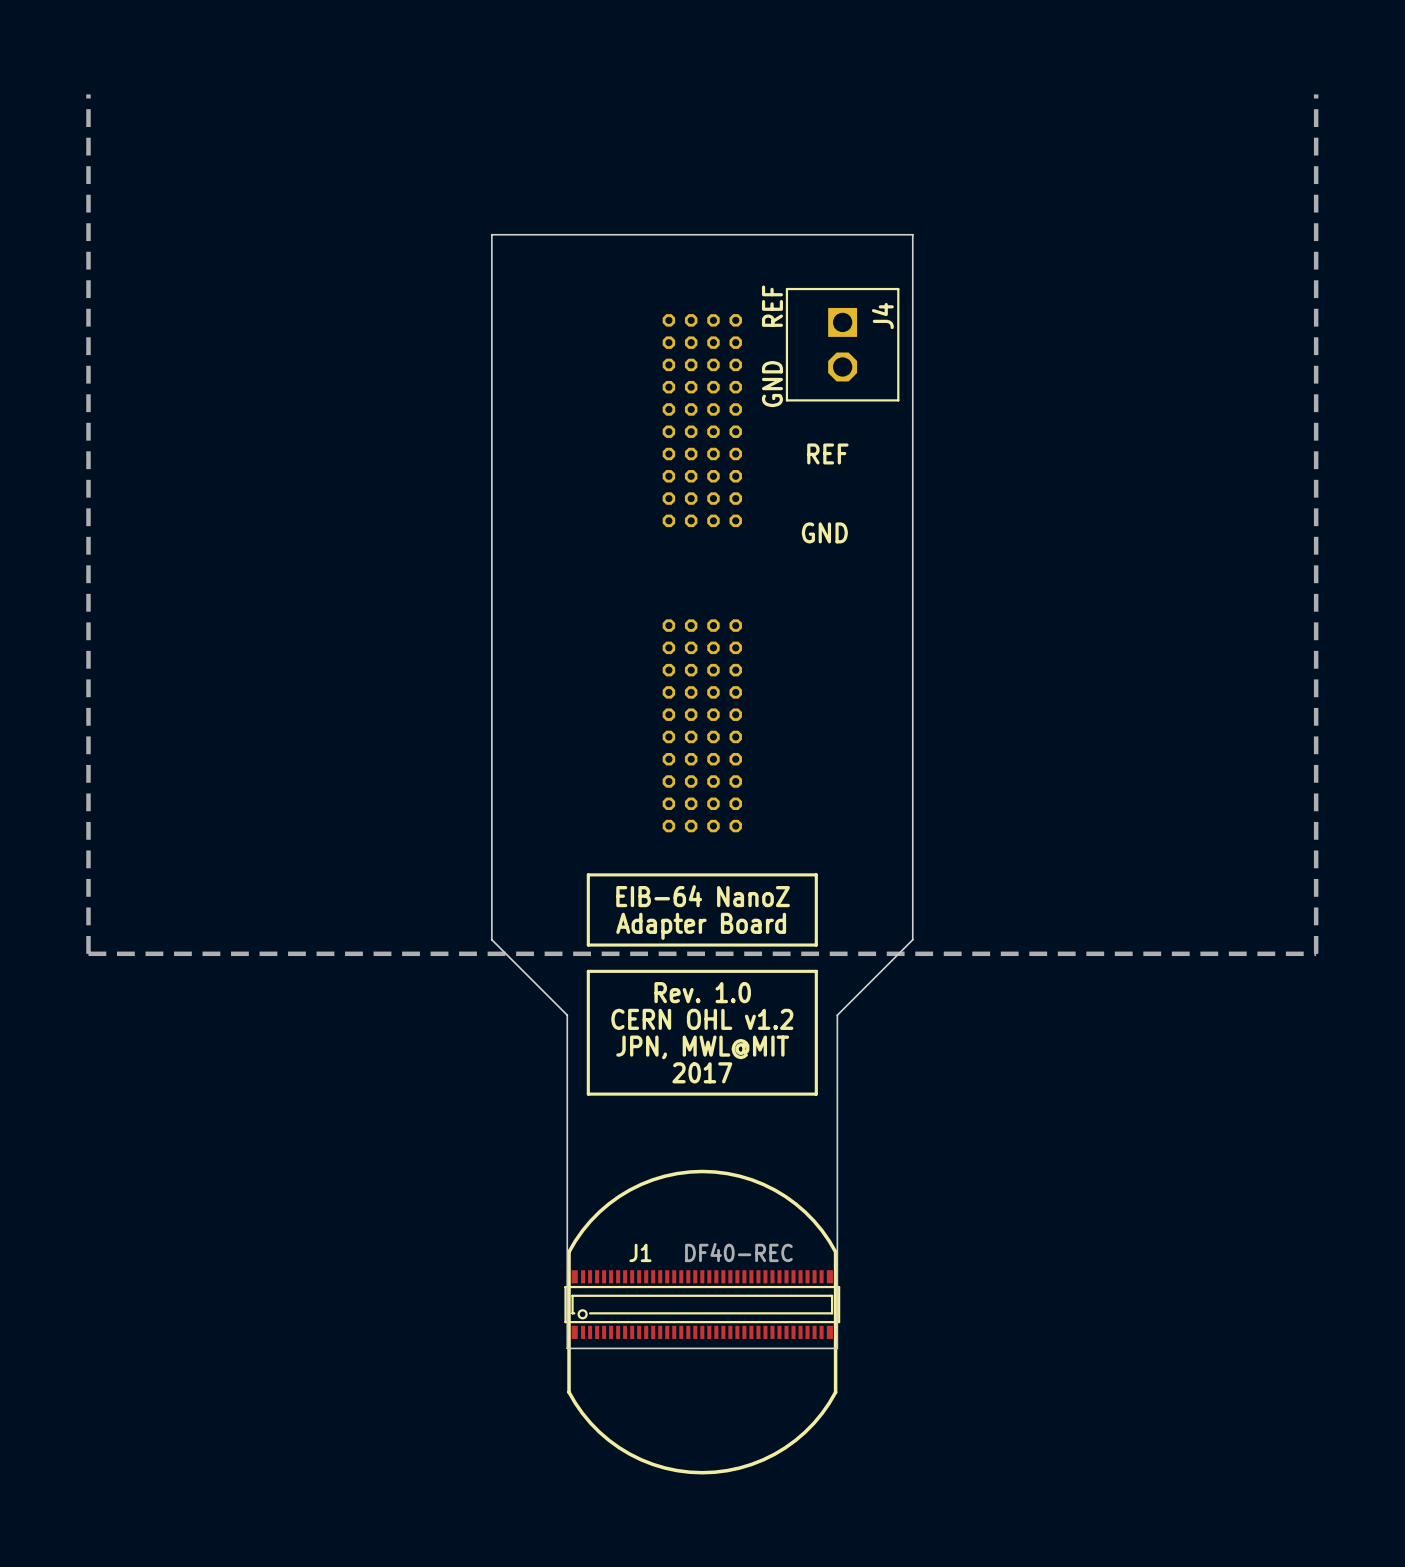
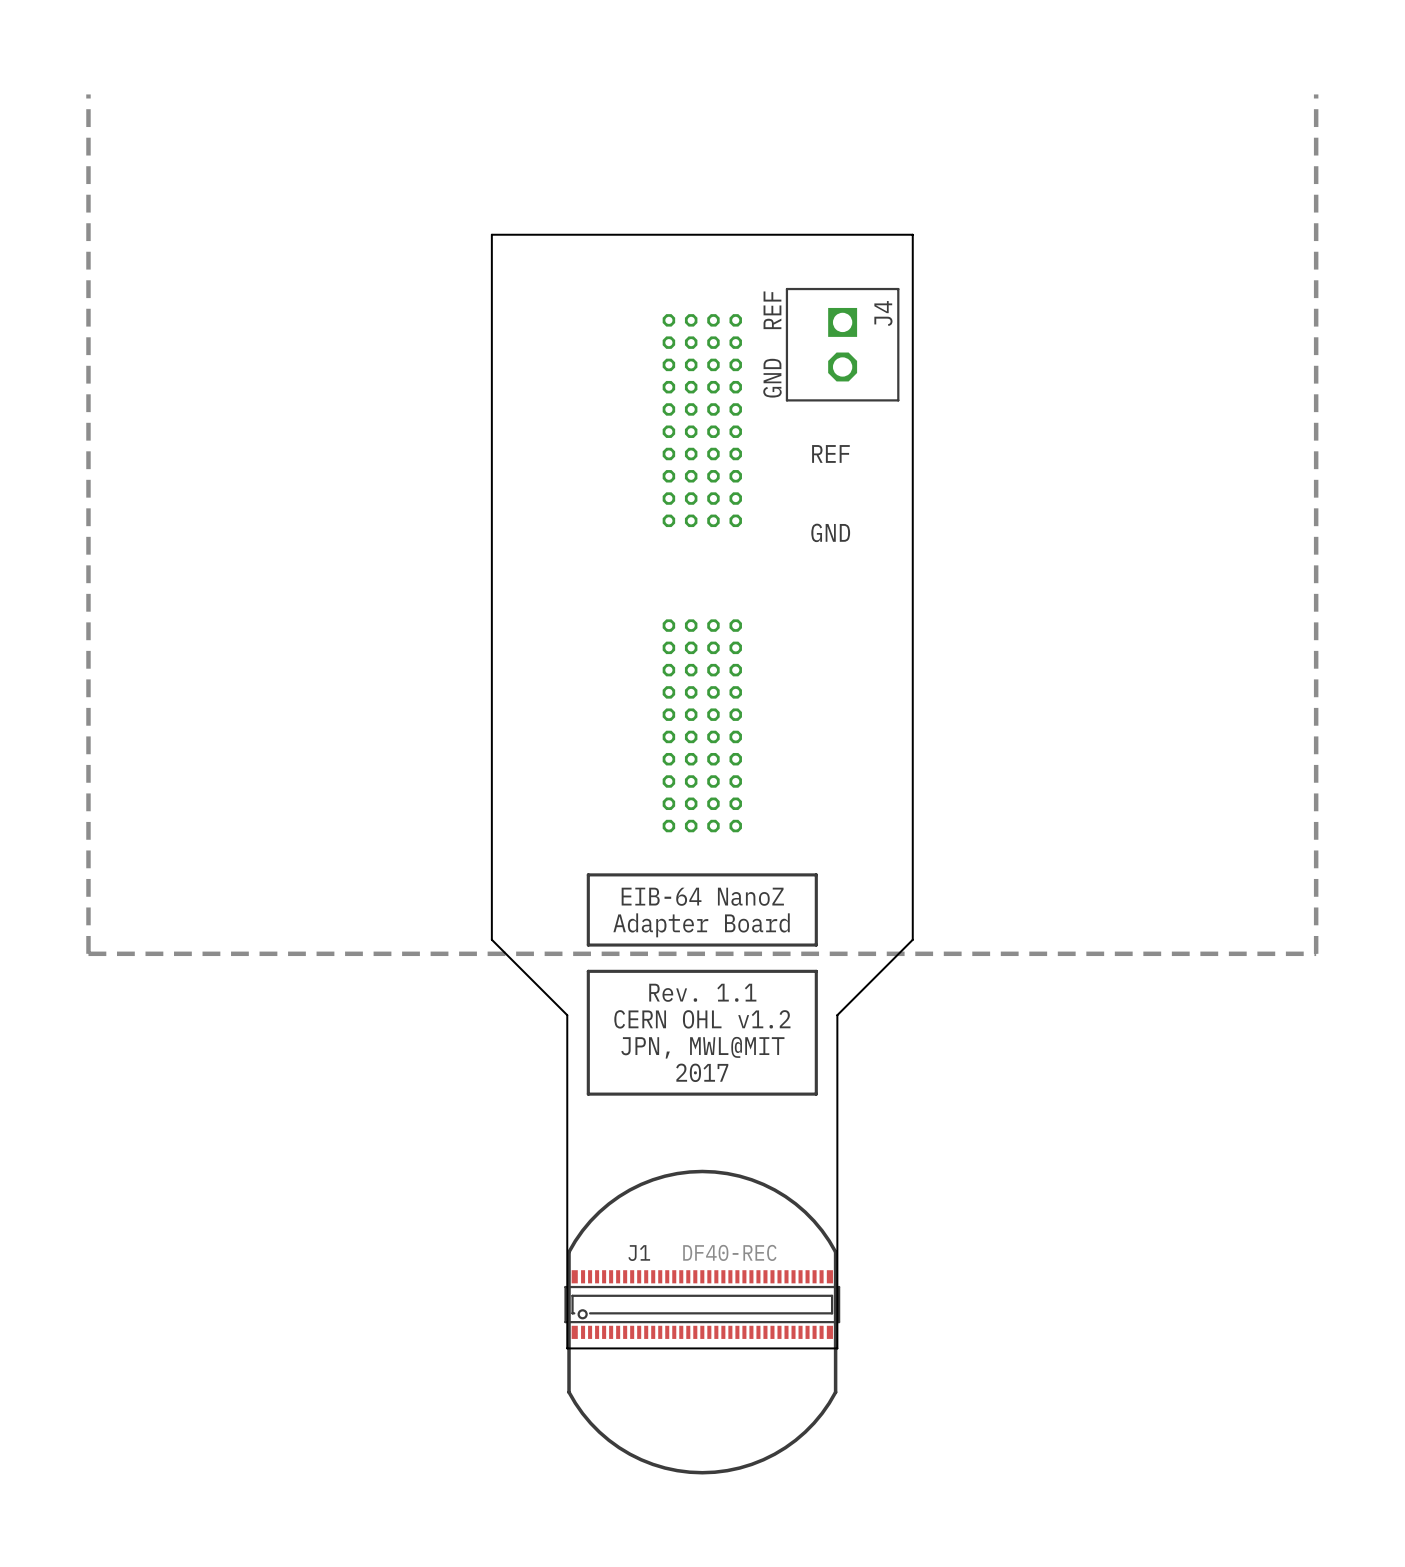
text: Rev. 1.0 (702, 992) -> Rev. 1.1 (702, 992)

